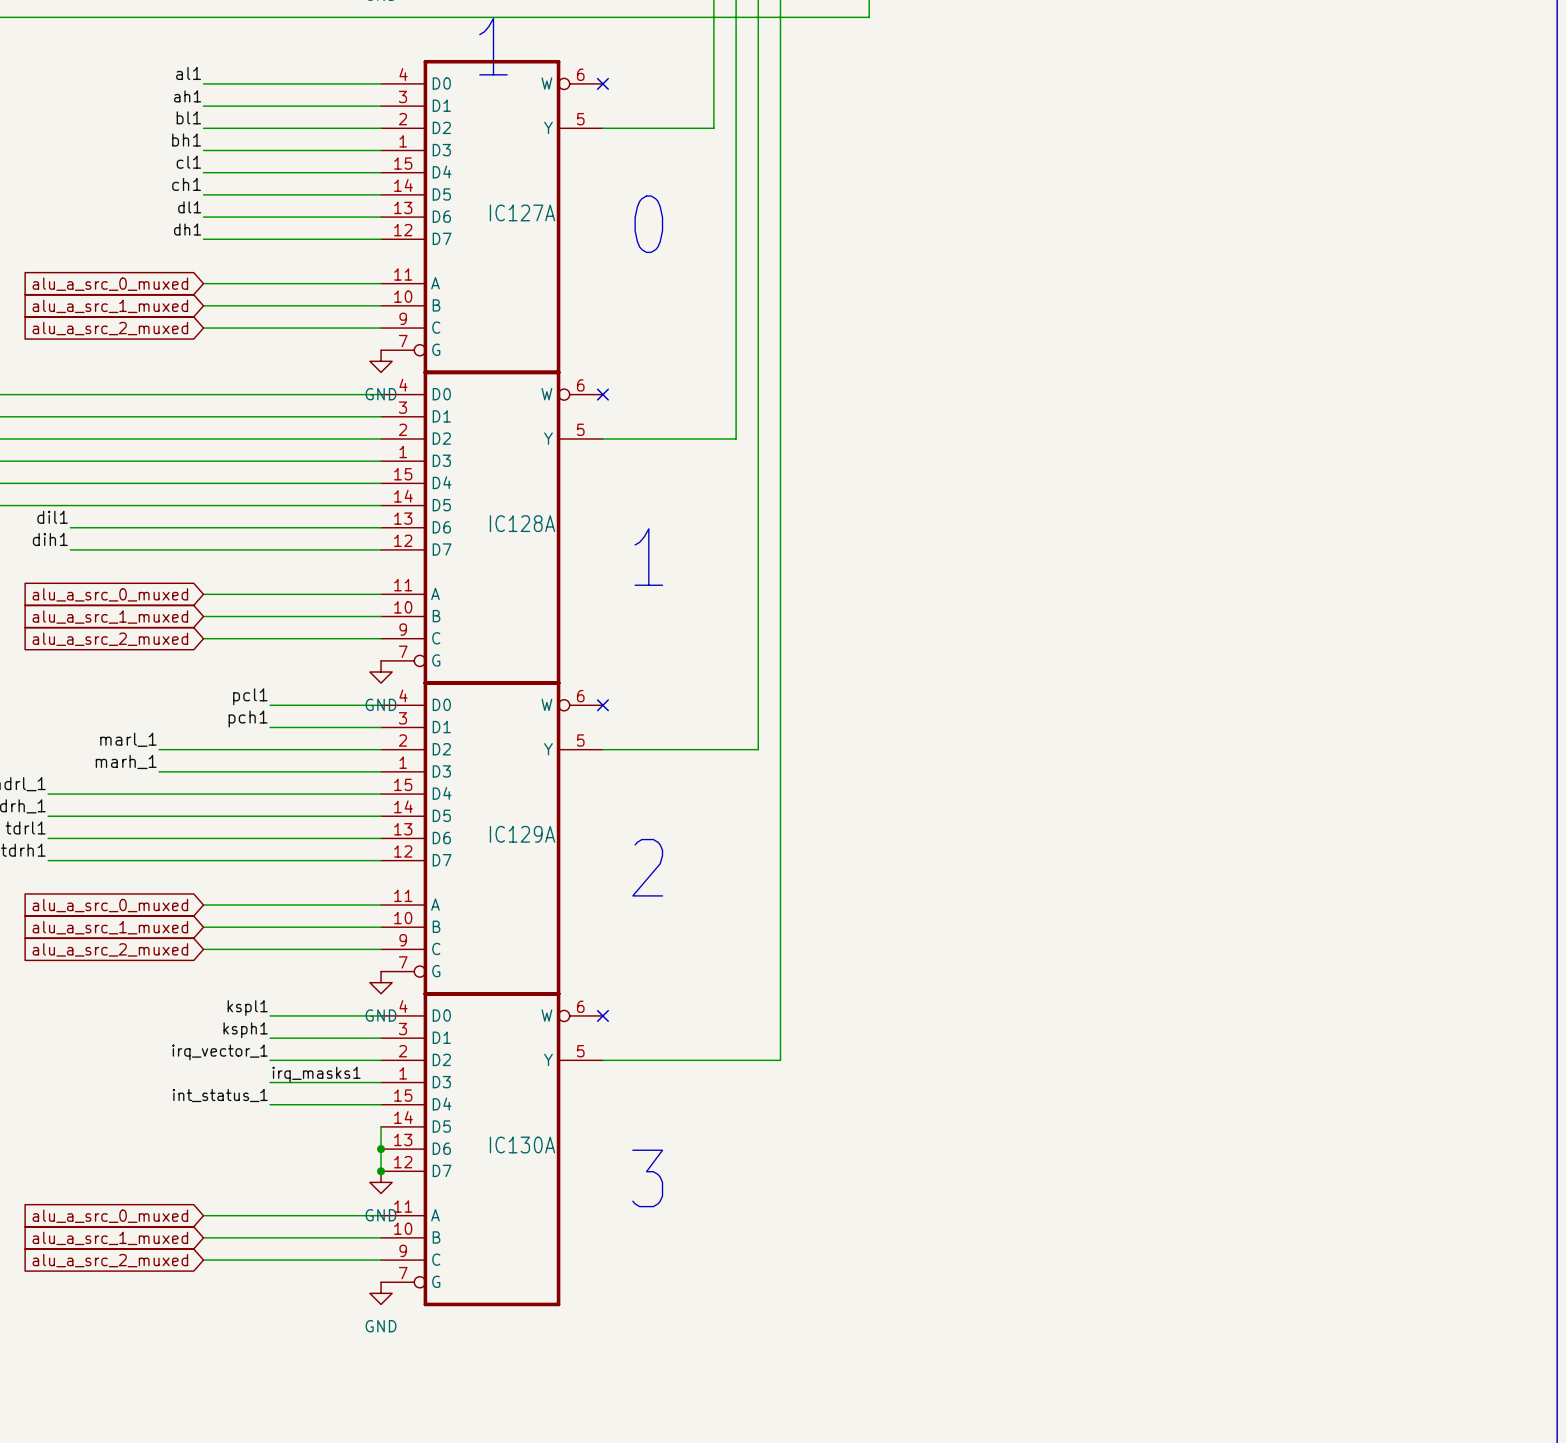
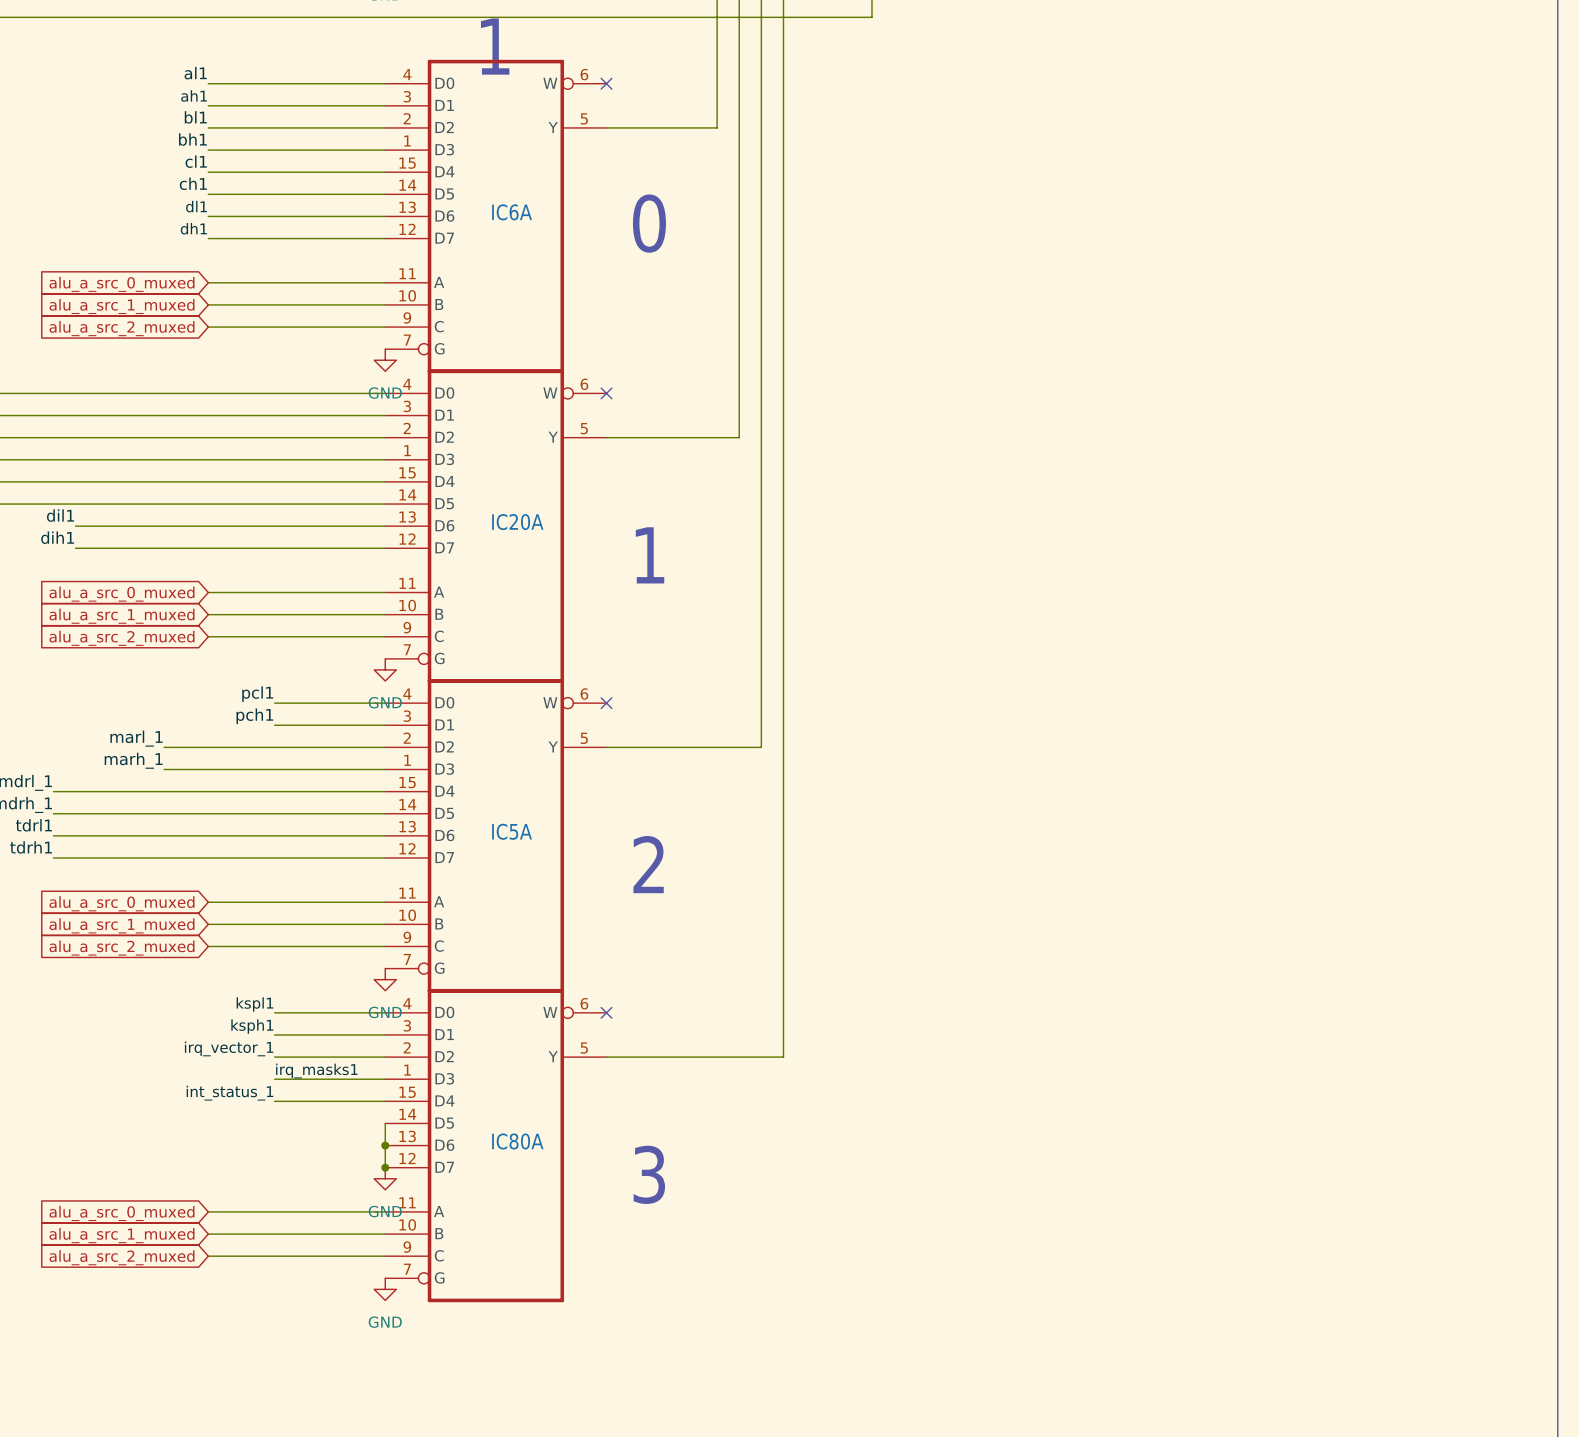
IC127A name: IC127A (522, 212) -> IC6A (512, 212)
IC128A name: IC128A (522, 523) -> IC20A (517, 522)
IC129A name: IC129A (522, 834) -> IC5A (512, 831)
IC130A name: IC130A (522, 1144) -> IC80A (517, 1141)

